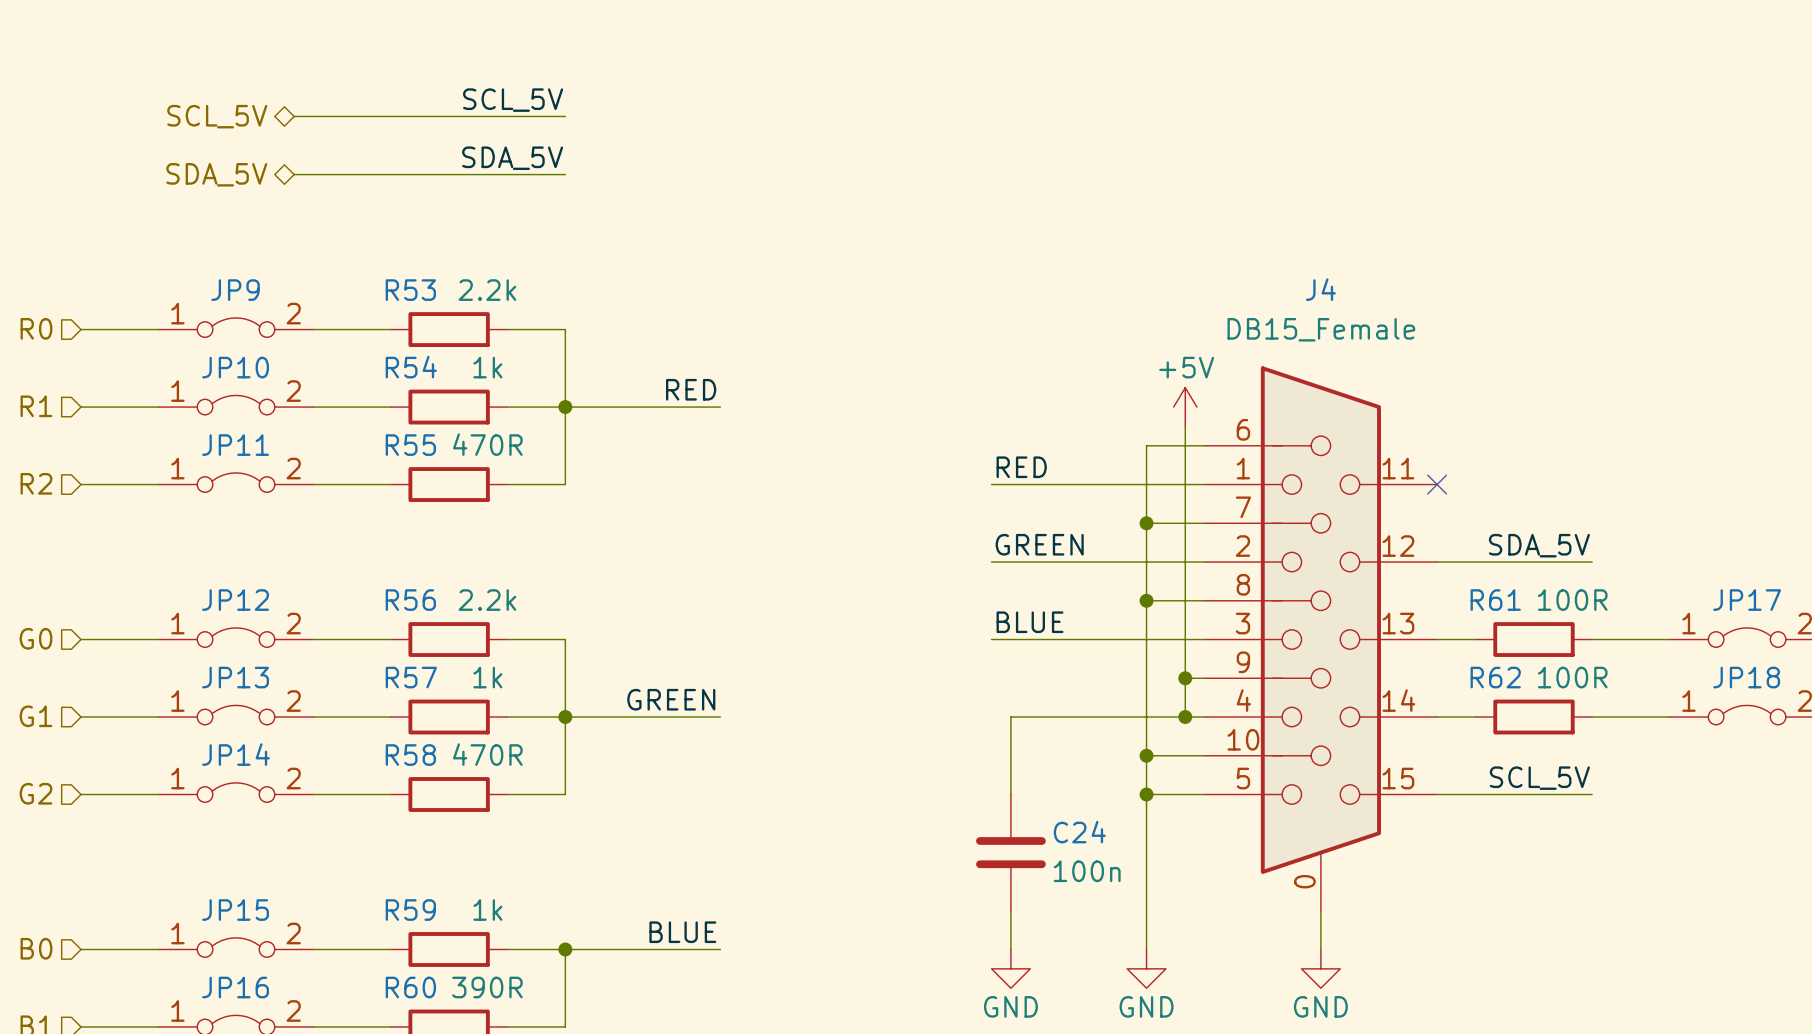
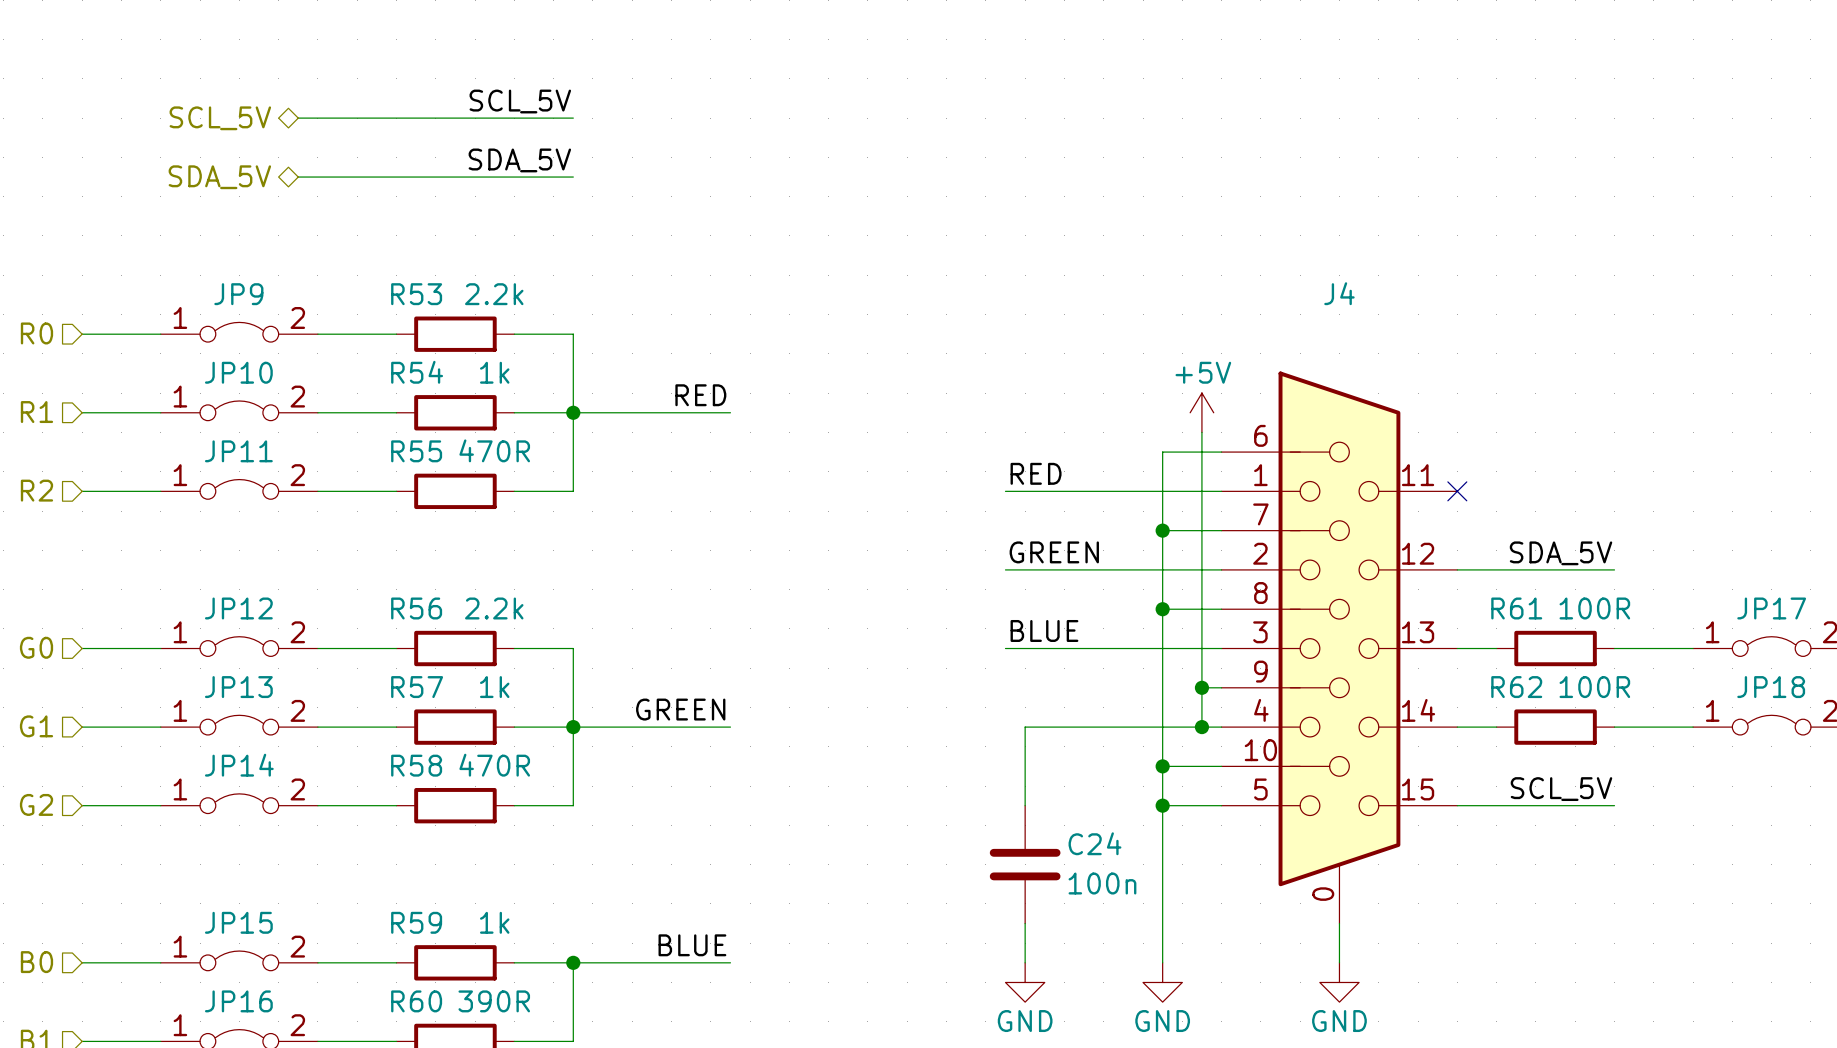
J4 value: DB15_Female (1321, 329) -> none

